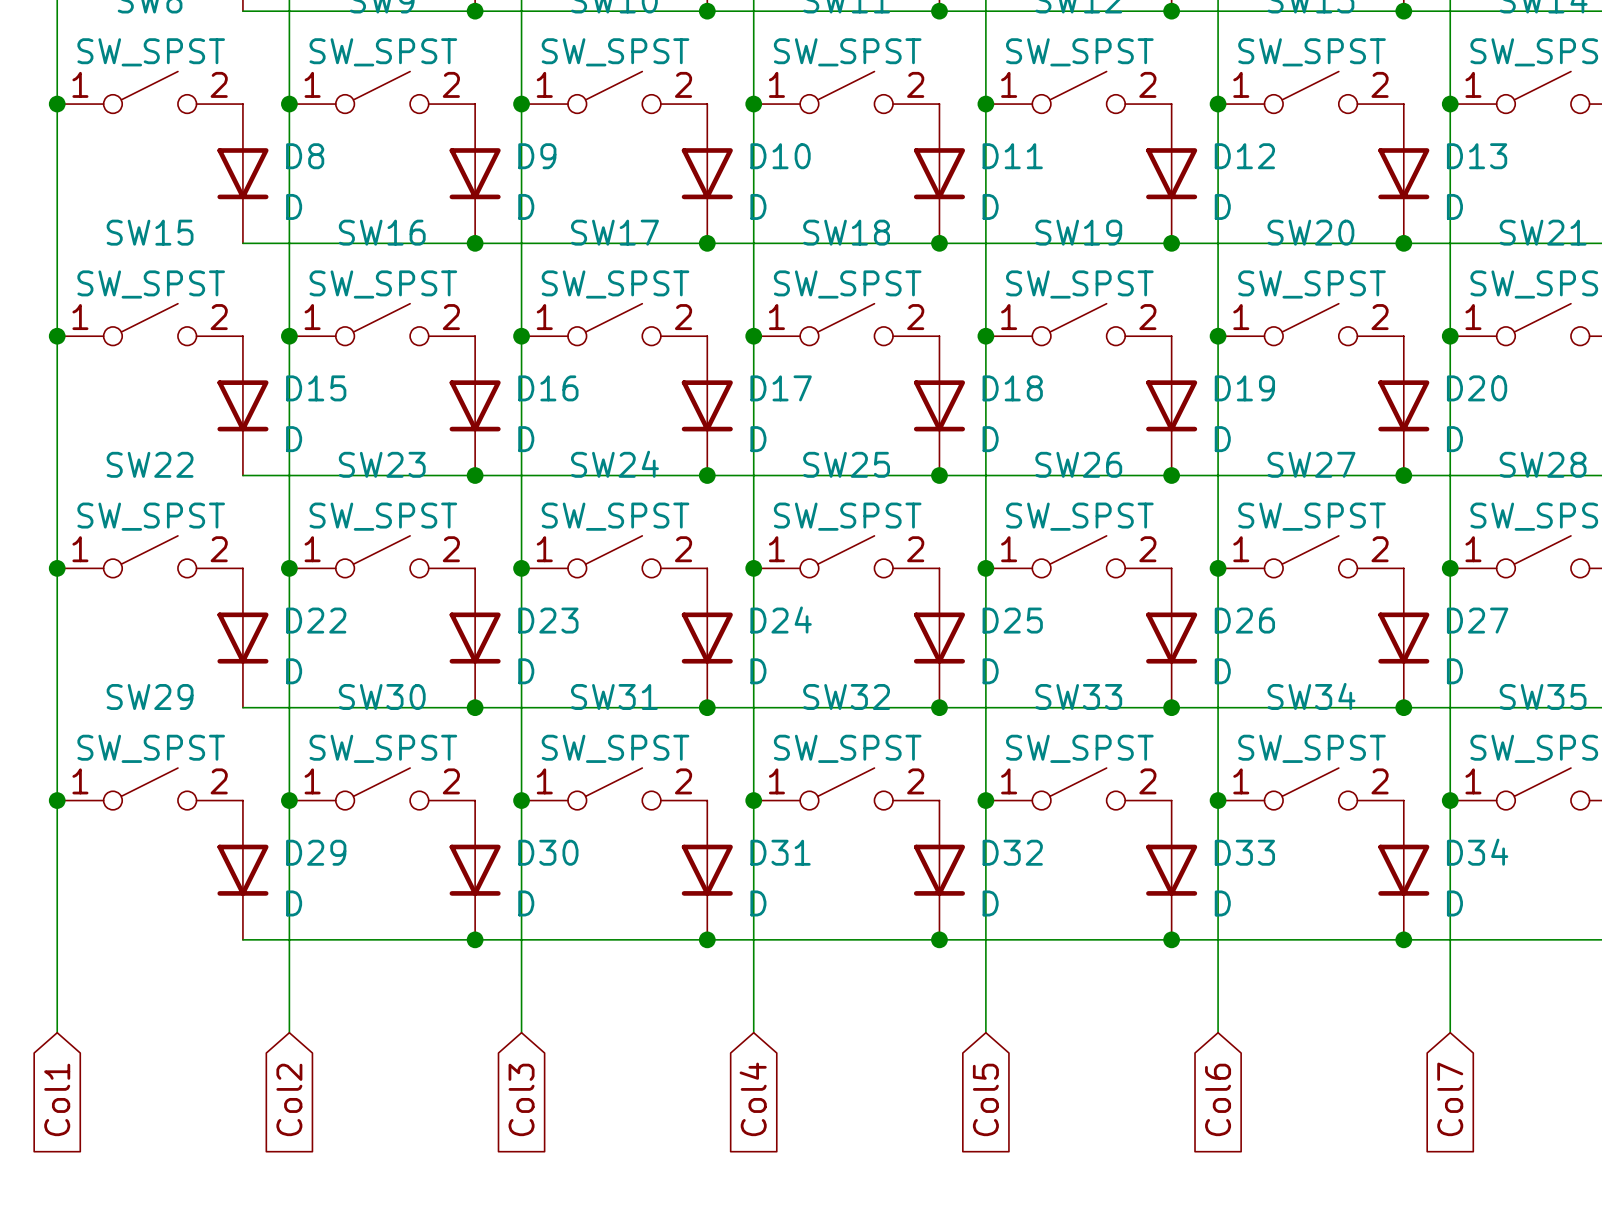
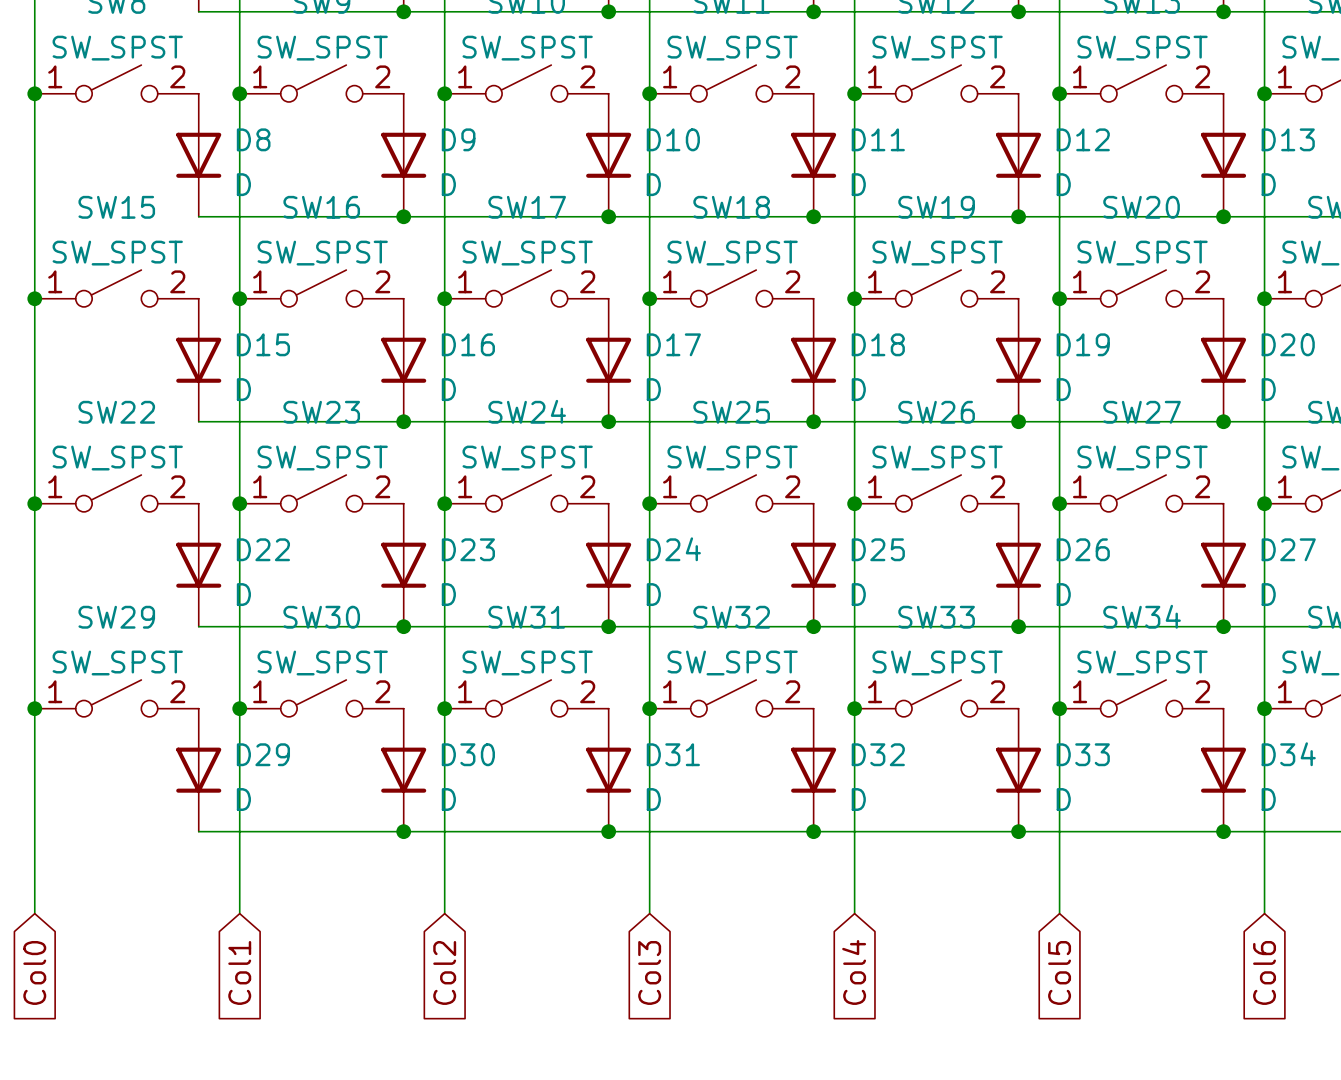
global label: Col1 (57, 1099) -> Col0 (34, 972)
global label: Col2 (289, 1099) -> Col1 (239, 972)
global label: Col3 (521, 1099) -> Col2 (444, 972)
global label: Col4 (753, 1099) -> Col3 (649, 972)
global label: Col5 (985, 1099) -> Col4 (854, 972)
global label: Col6 (1218, 1099) -> Col5 (1059, 972)
global label: Col7 (1450, 1099) -> Col6 (1264, 972)

